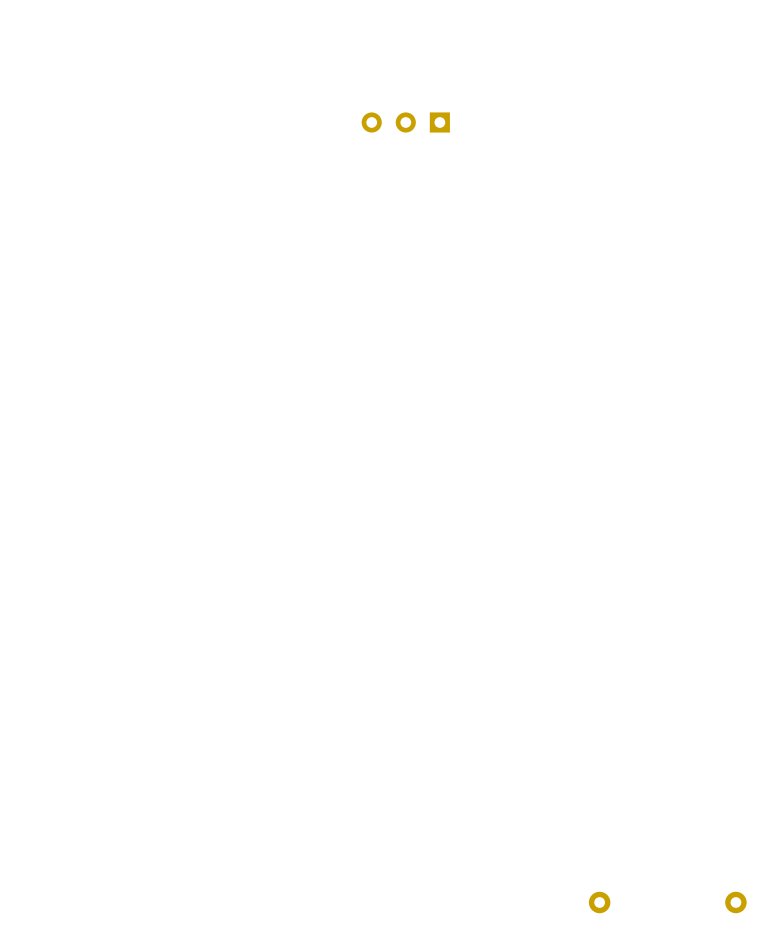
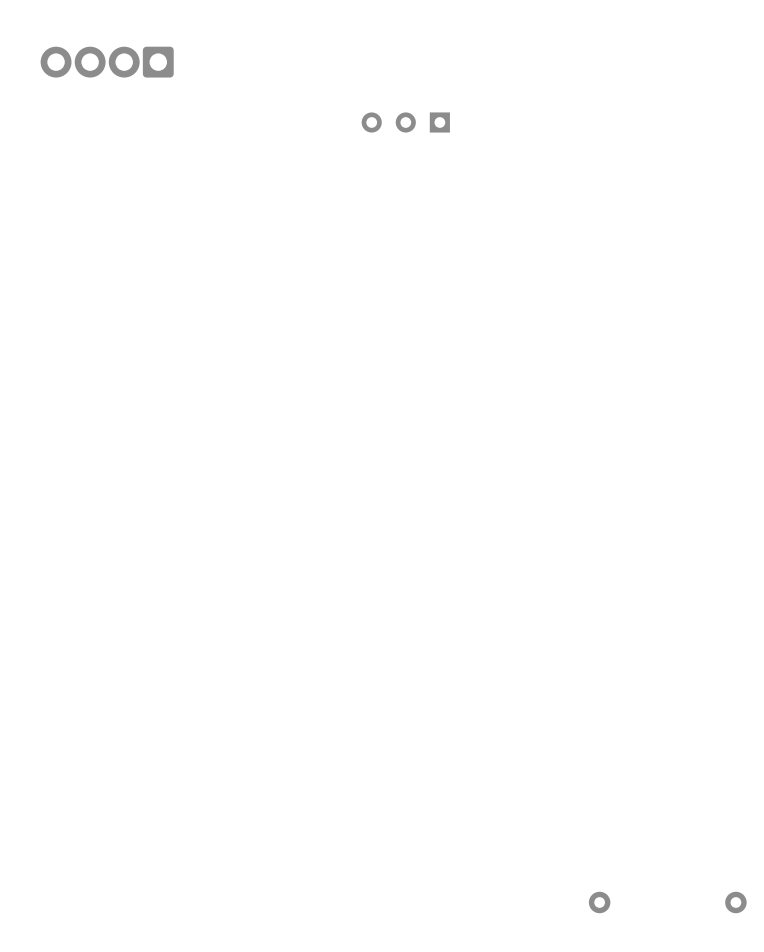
part: none -> (107, 62)

